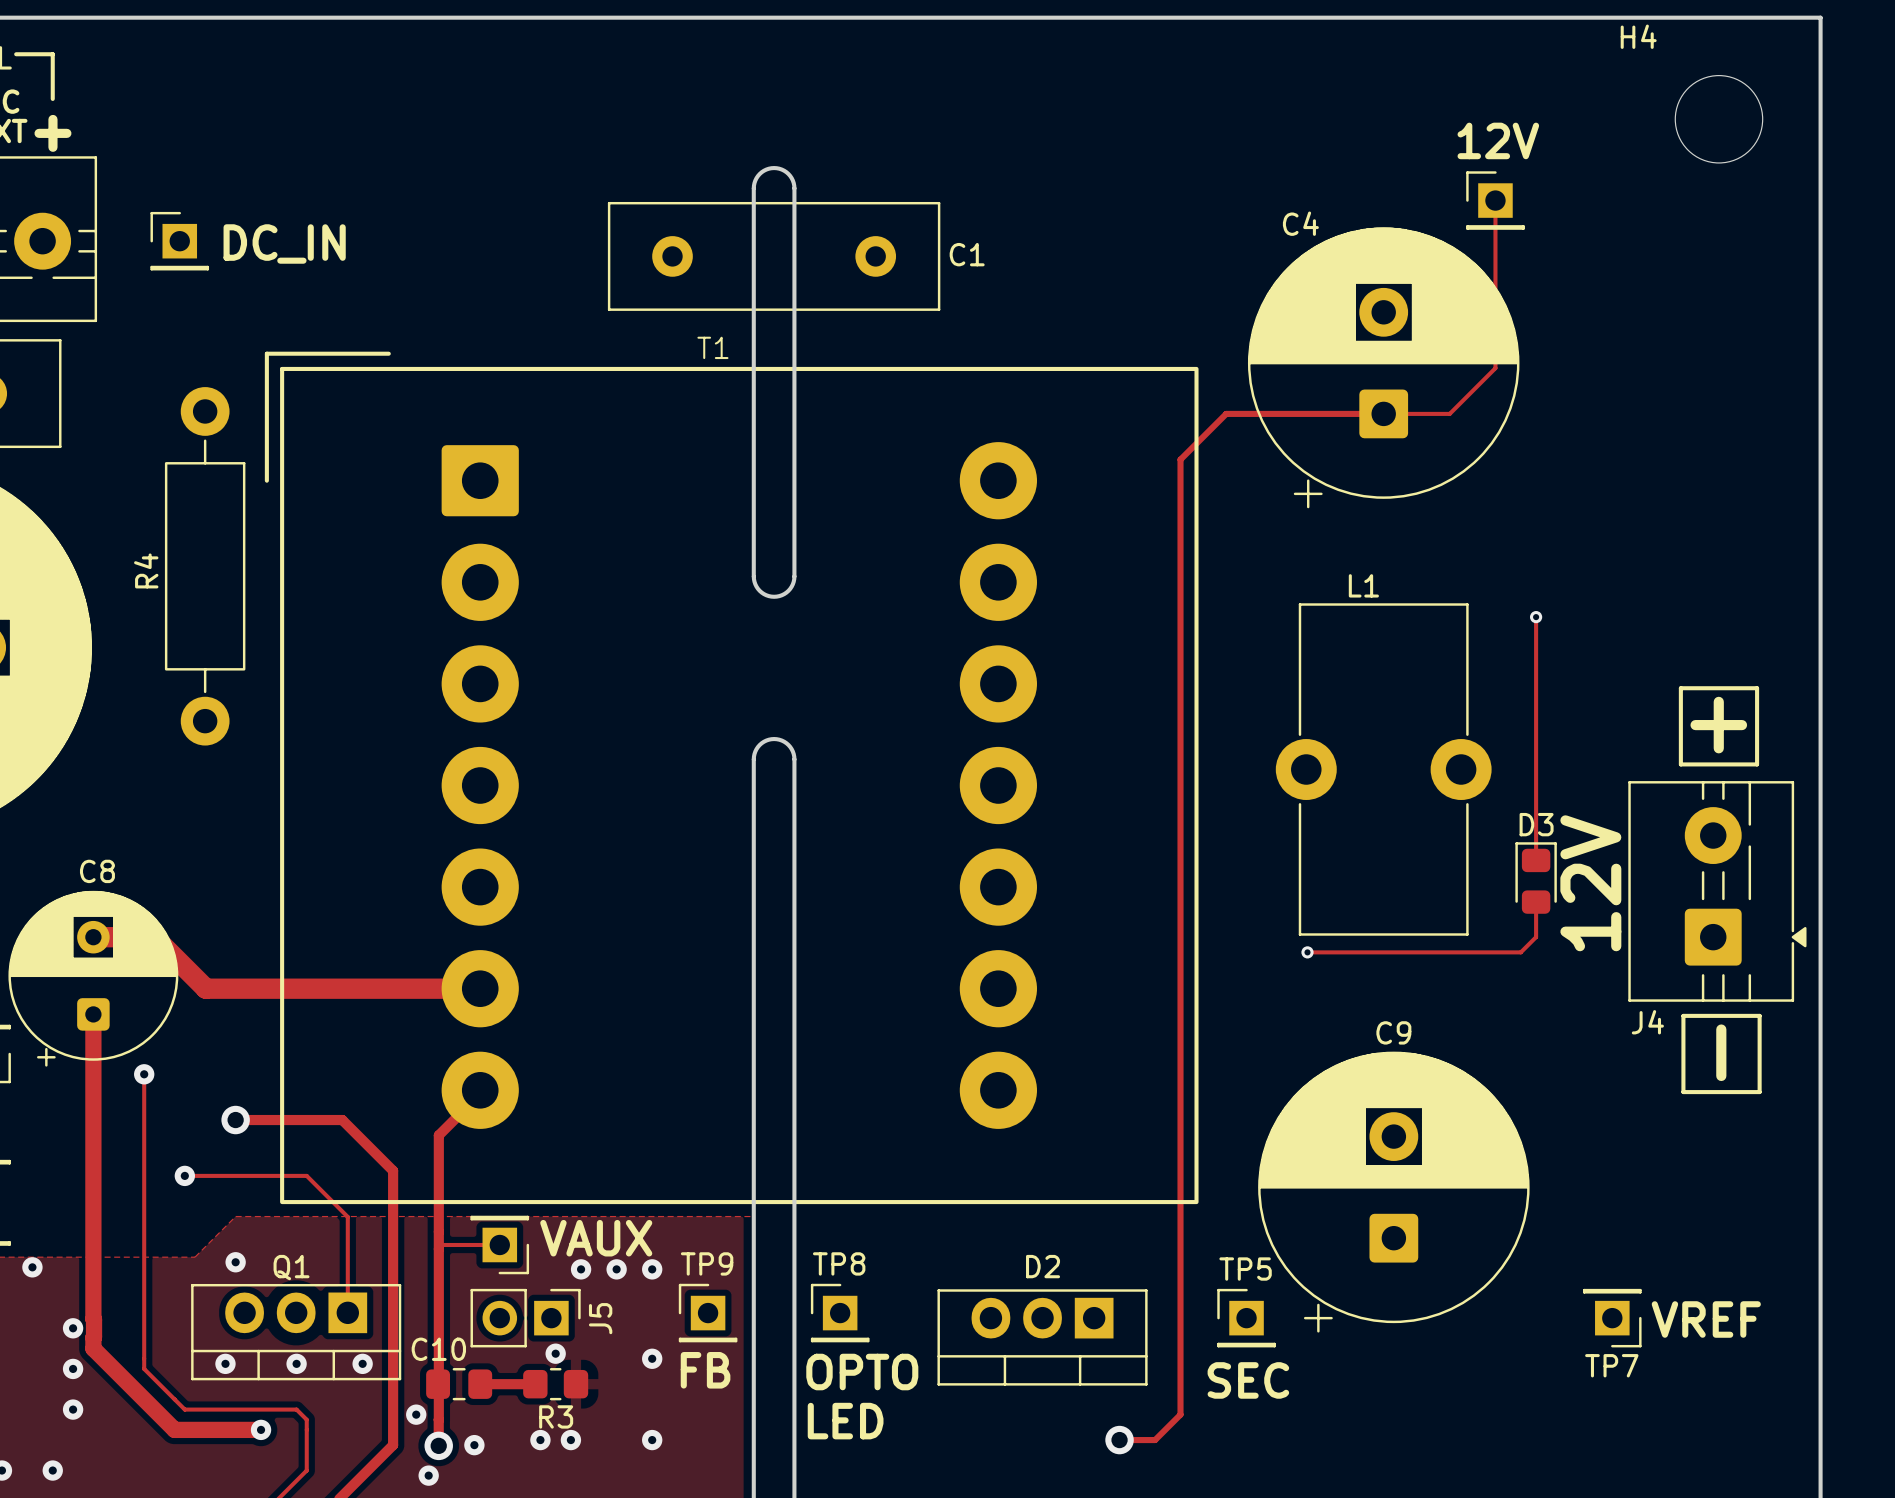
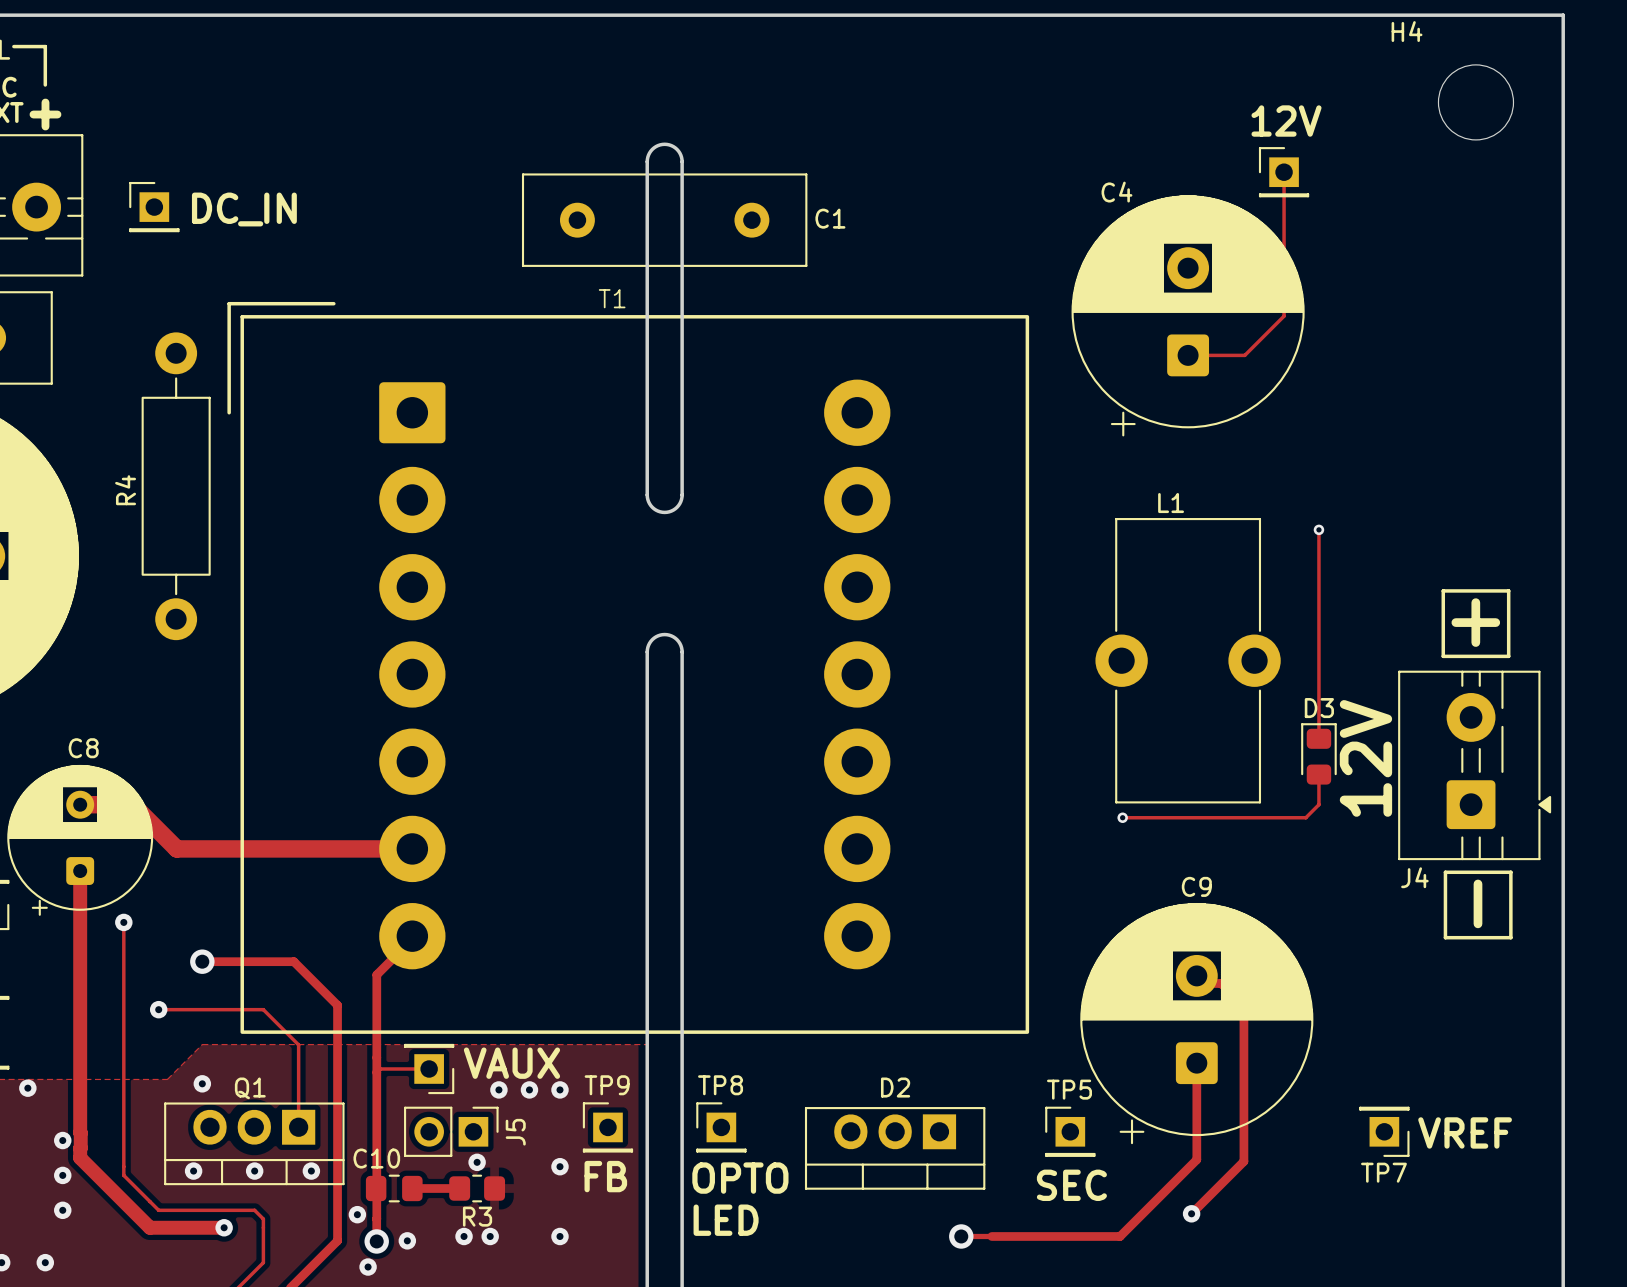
track: (1383, 413) (1226, 413) (1180, 459) (1180, 1414) (1155, 1440) -> (1196, 1063) (1196, 1159) (1120, 1236) (991, 1236)
track: none -> (1196, 975) (1204, 983) (1221, 983) (1243, 1006) (1243, 1161) (1191, 1213)
via: none -> (1191, 1213)

